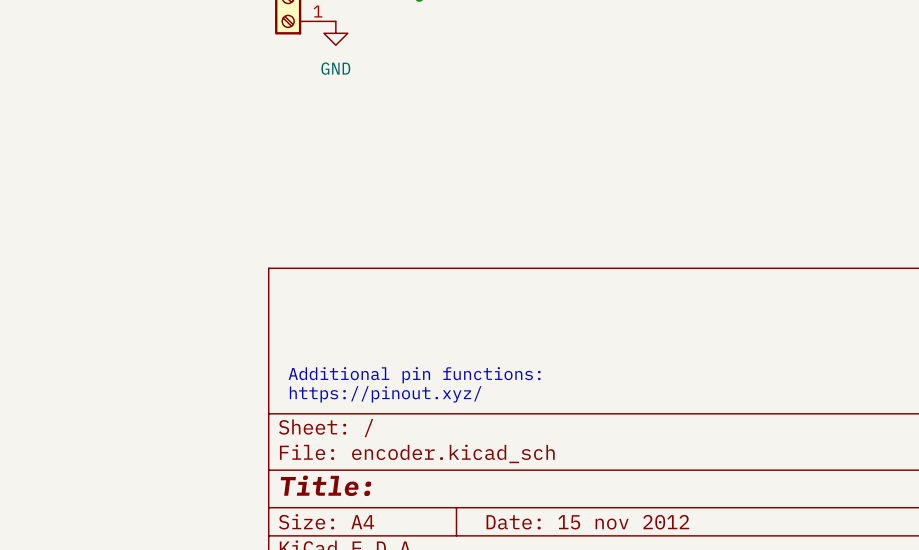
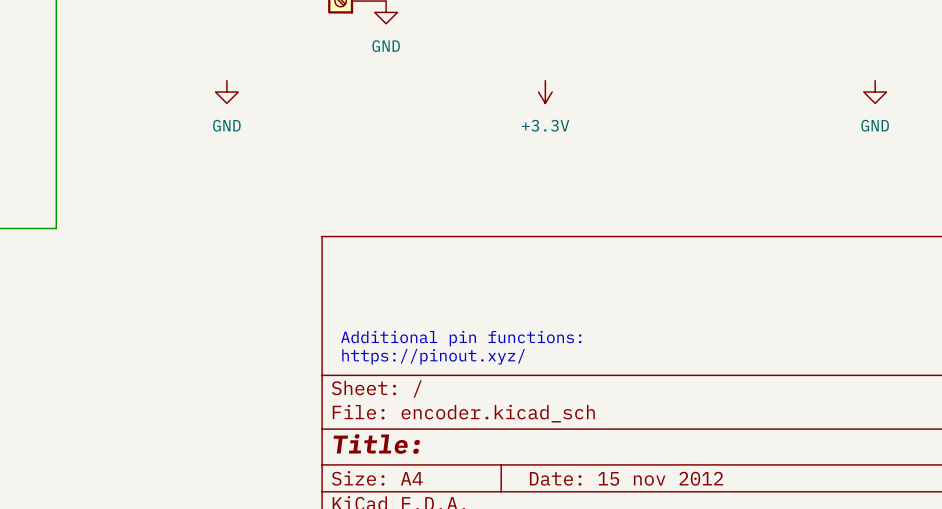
power symbol: none -> GND (226, 92)
power symbol: none -> +3.3V (545, 92)
power symbol: none -> GND (875, 92)

